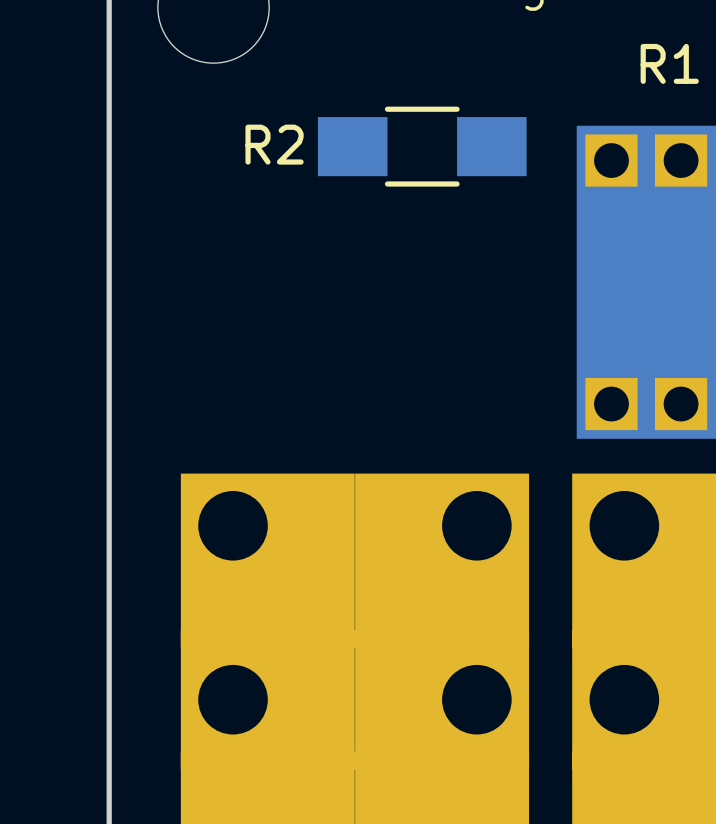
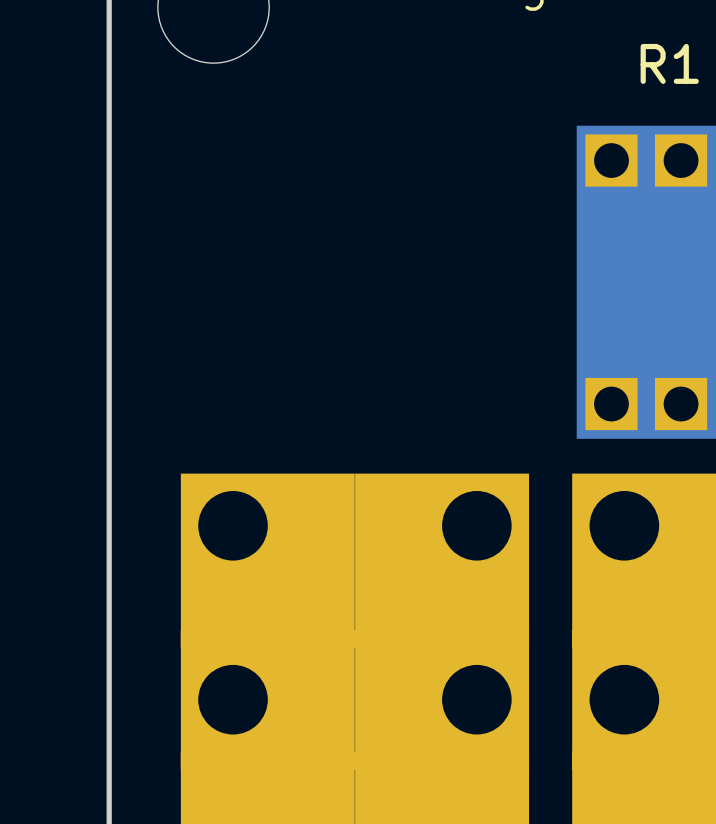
R2: (422, 146) -> none

